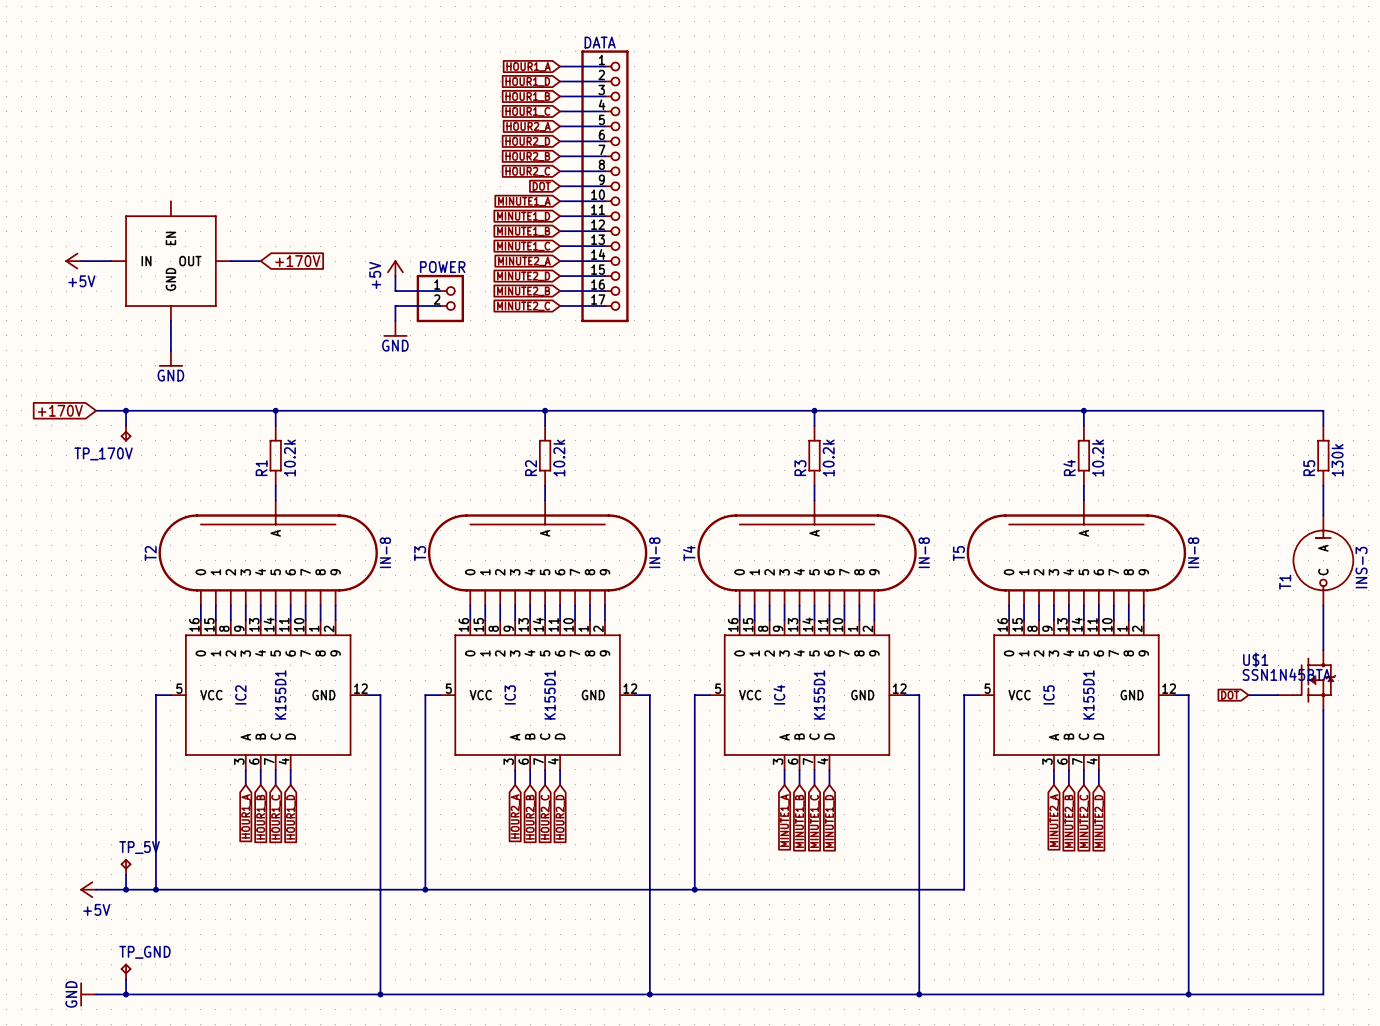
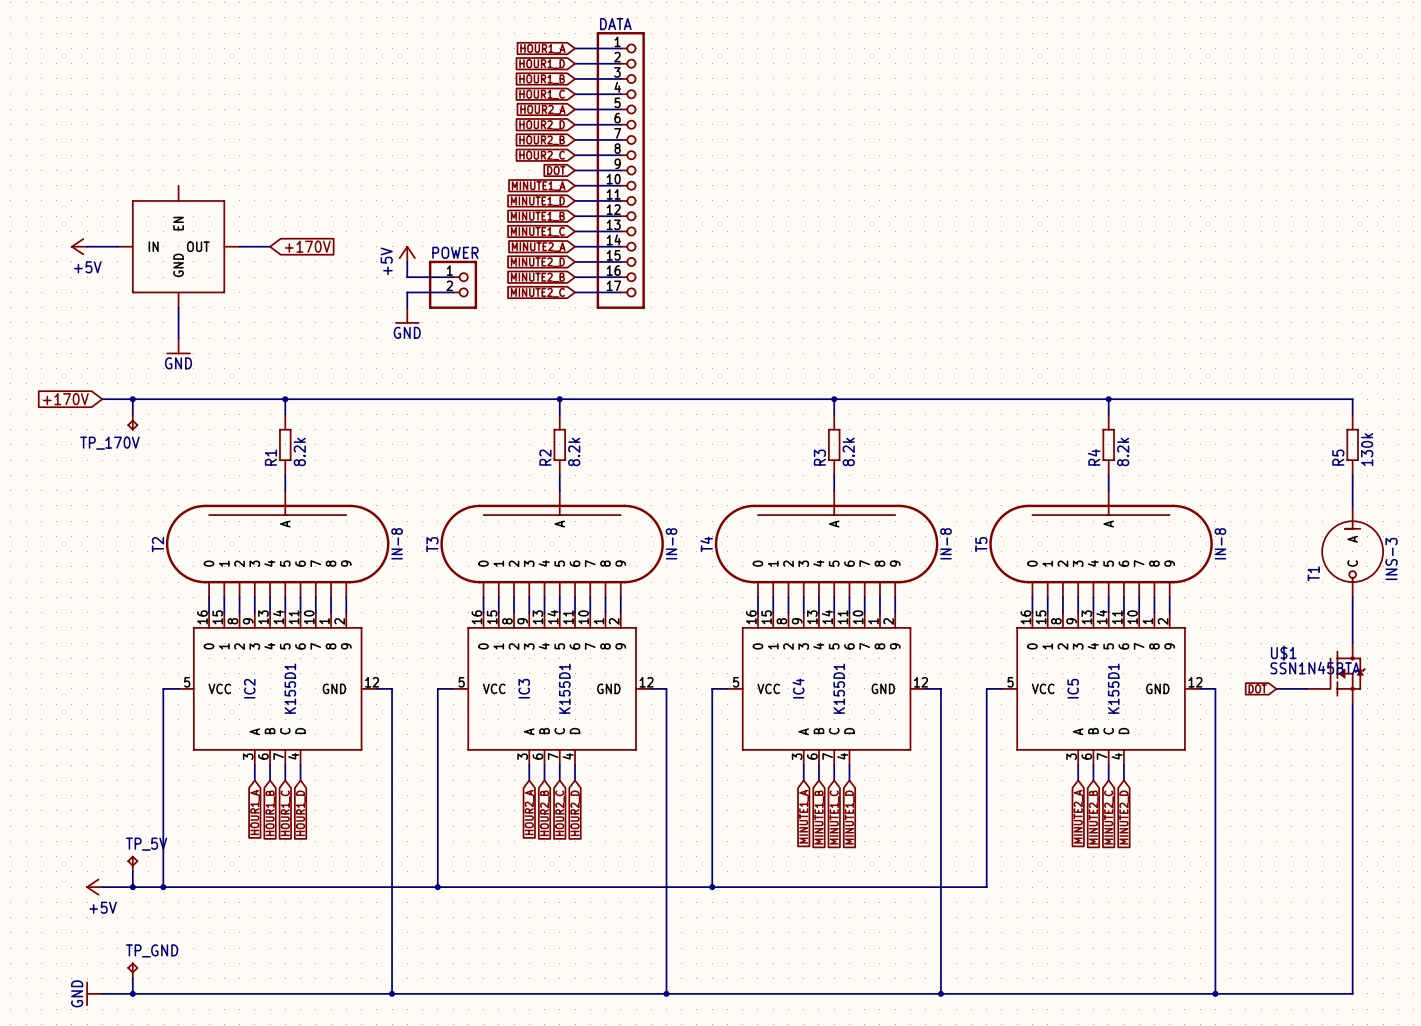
R1 value: 10.2k (289, 458) -> 8.2k (299, 451)
R2 value: 10.2k (559, 458) -> 8.2k (574, 451)
R3 value: 10.2k (828, 458) -> 8.2k (848, 451)
R4 value: 10.2k (1098, 458) -> 8.2k (1123, 451)

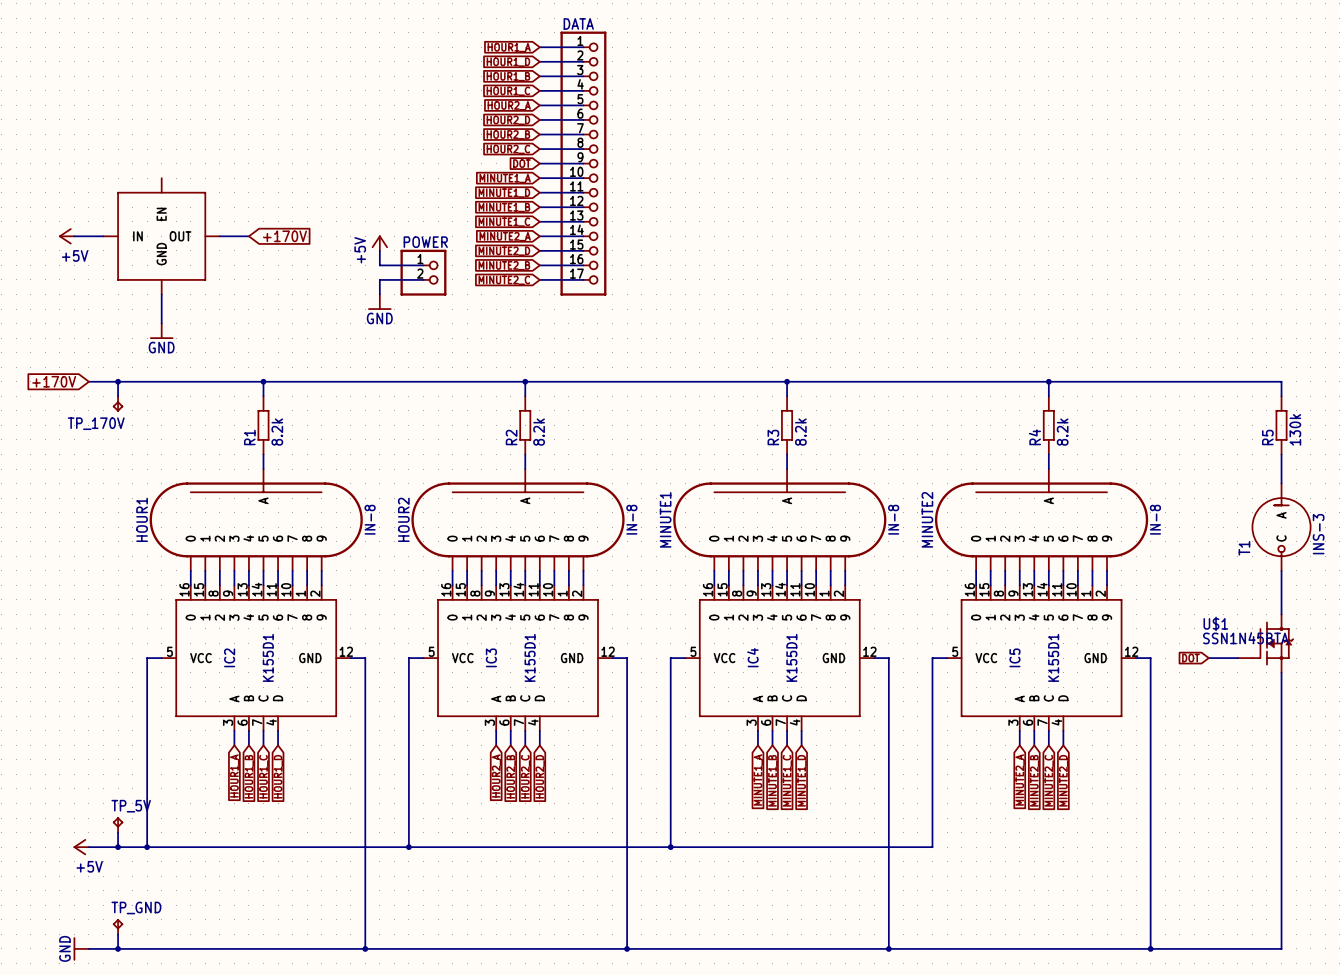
T2 name: T2 (157, 544) -> HOUR1 (142, 519)
T3 name: T3 (432, 544) -> HOUR2 (403, 519)
T4 name: T4 (706, 544) -> MINUTE1 (665, 519)
T5 name: T5 (981, 544) -> MINUTE2 (927, 519)

